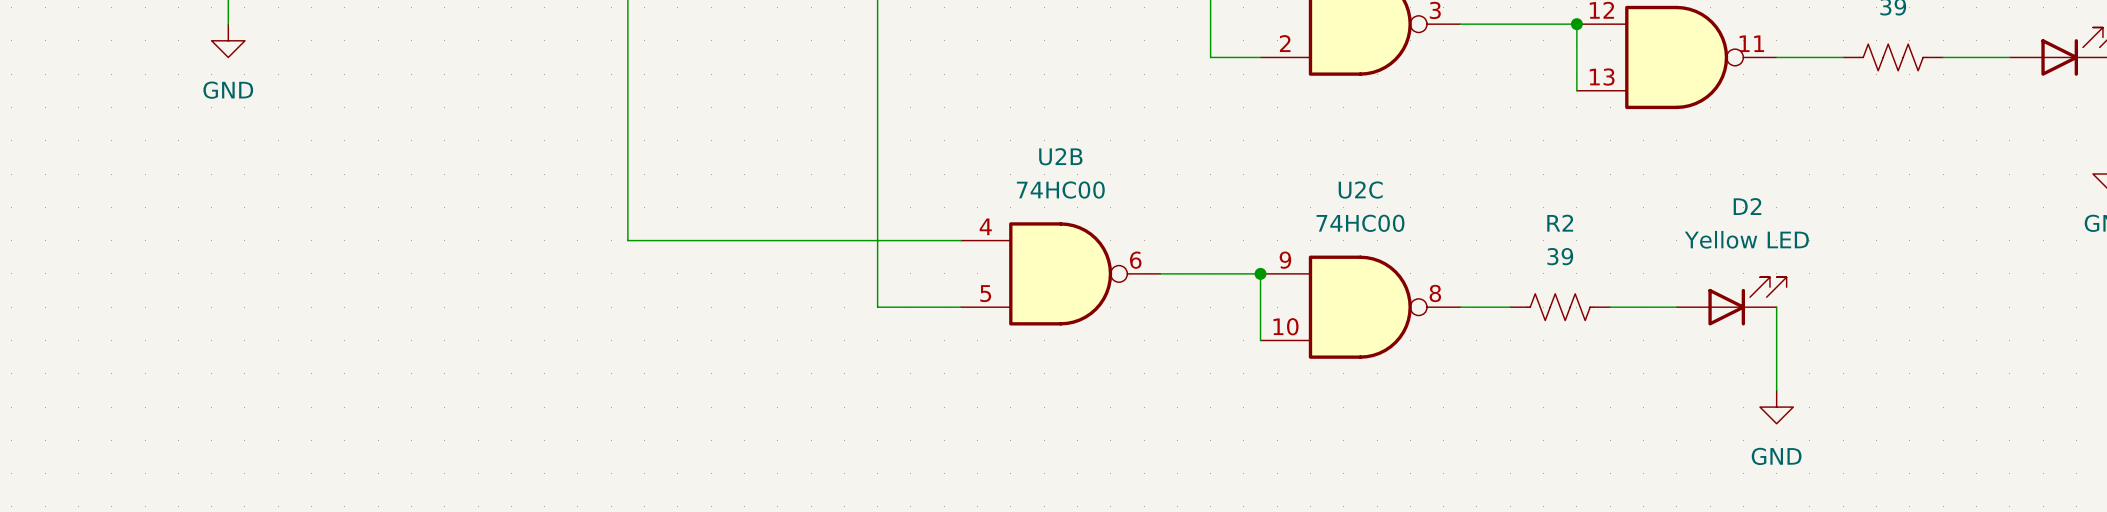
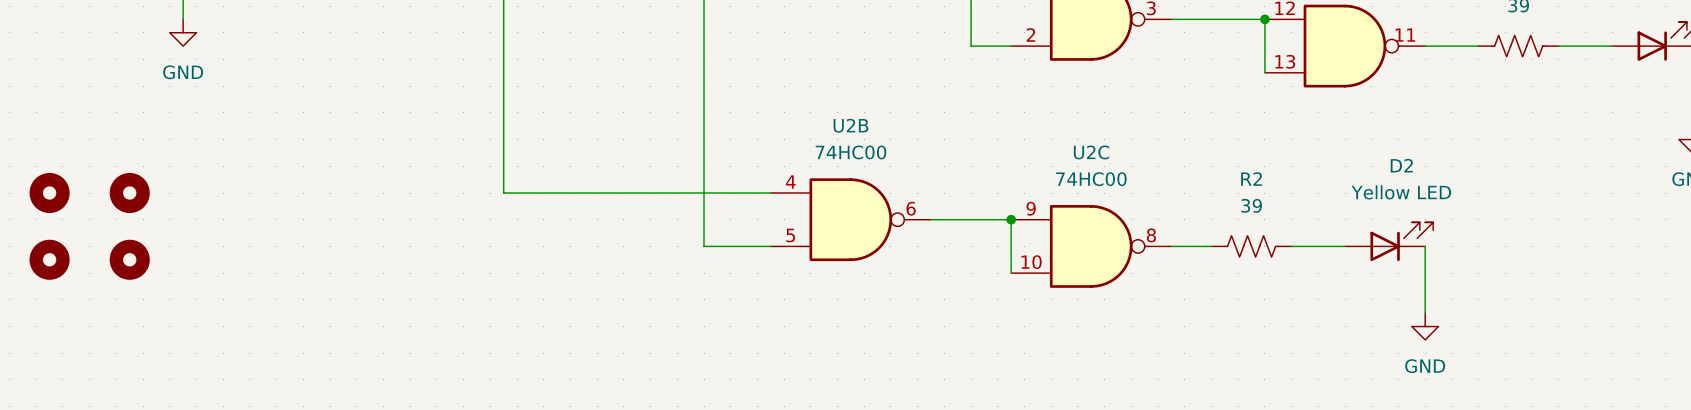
part: none -> (49, 193)
part: none -> (129, 193)
part: none -> (49, 259)
part: none -> (129, 259)

